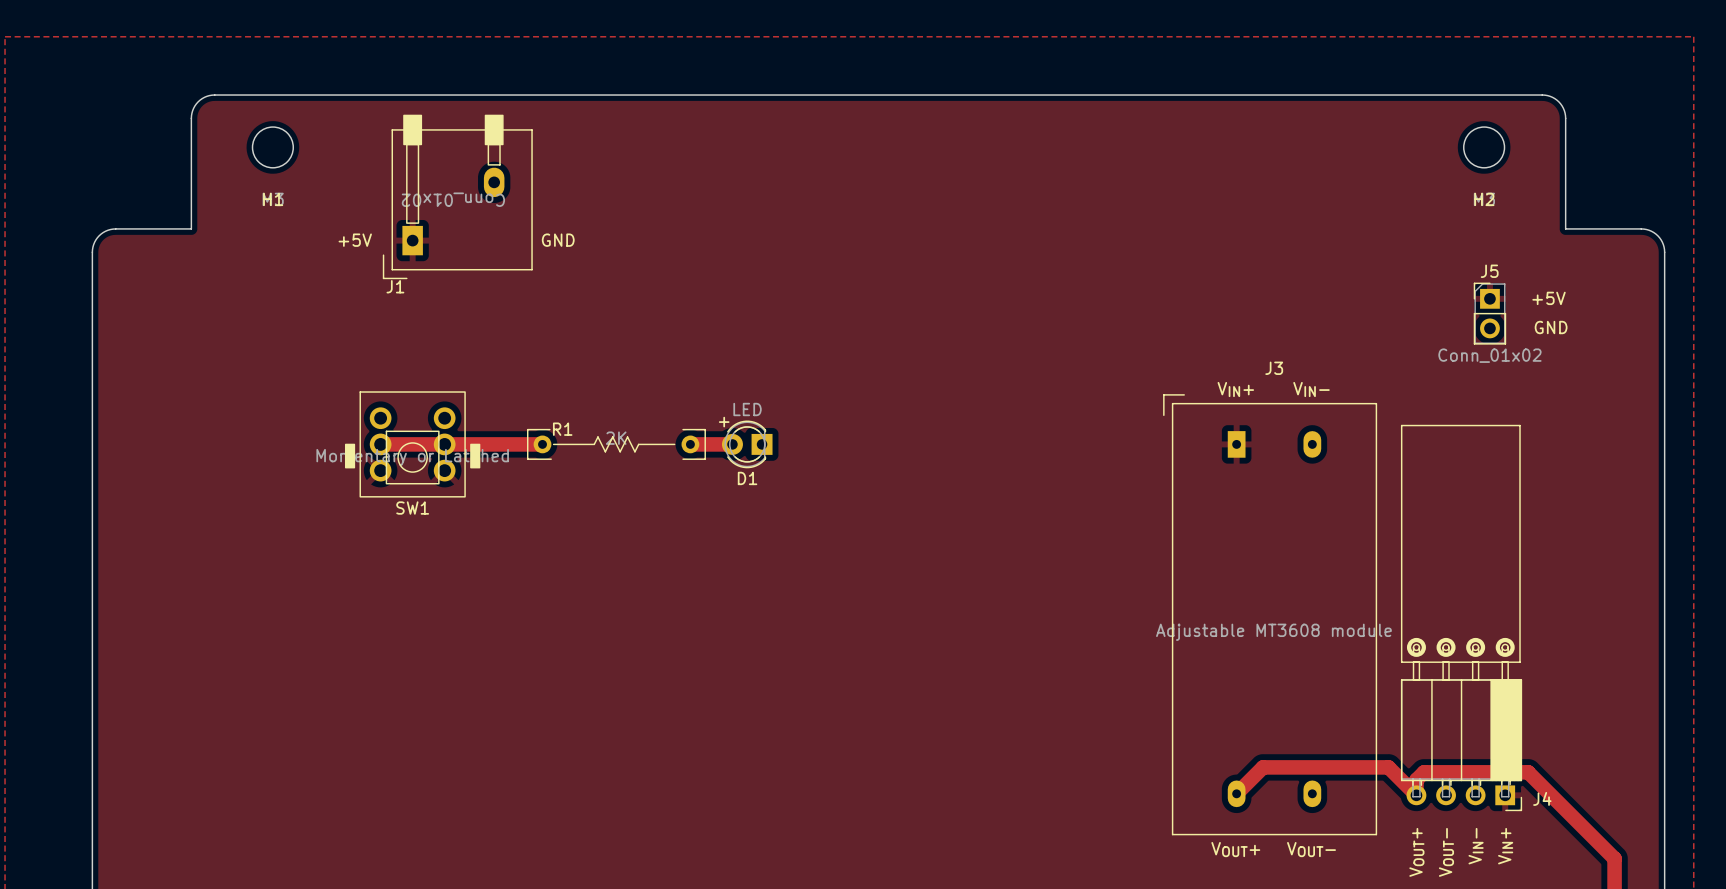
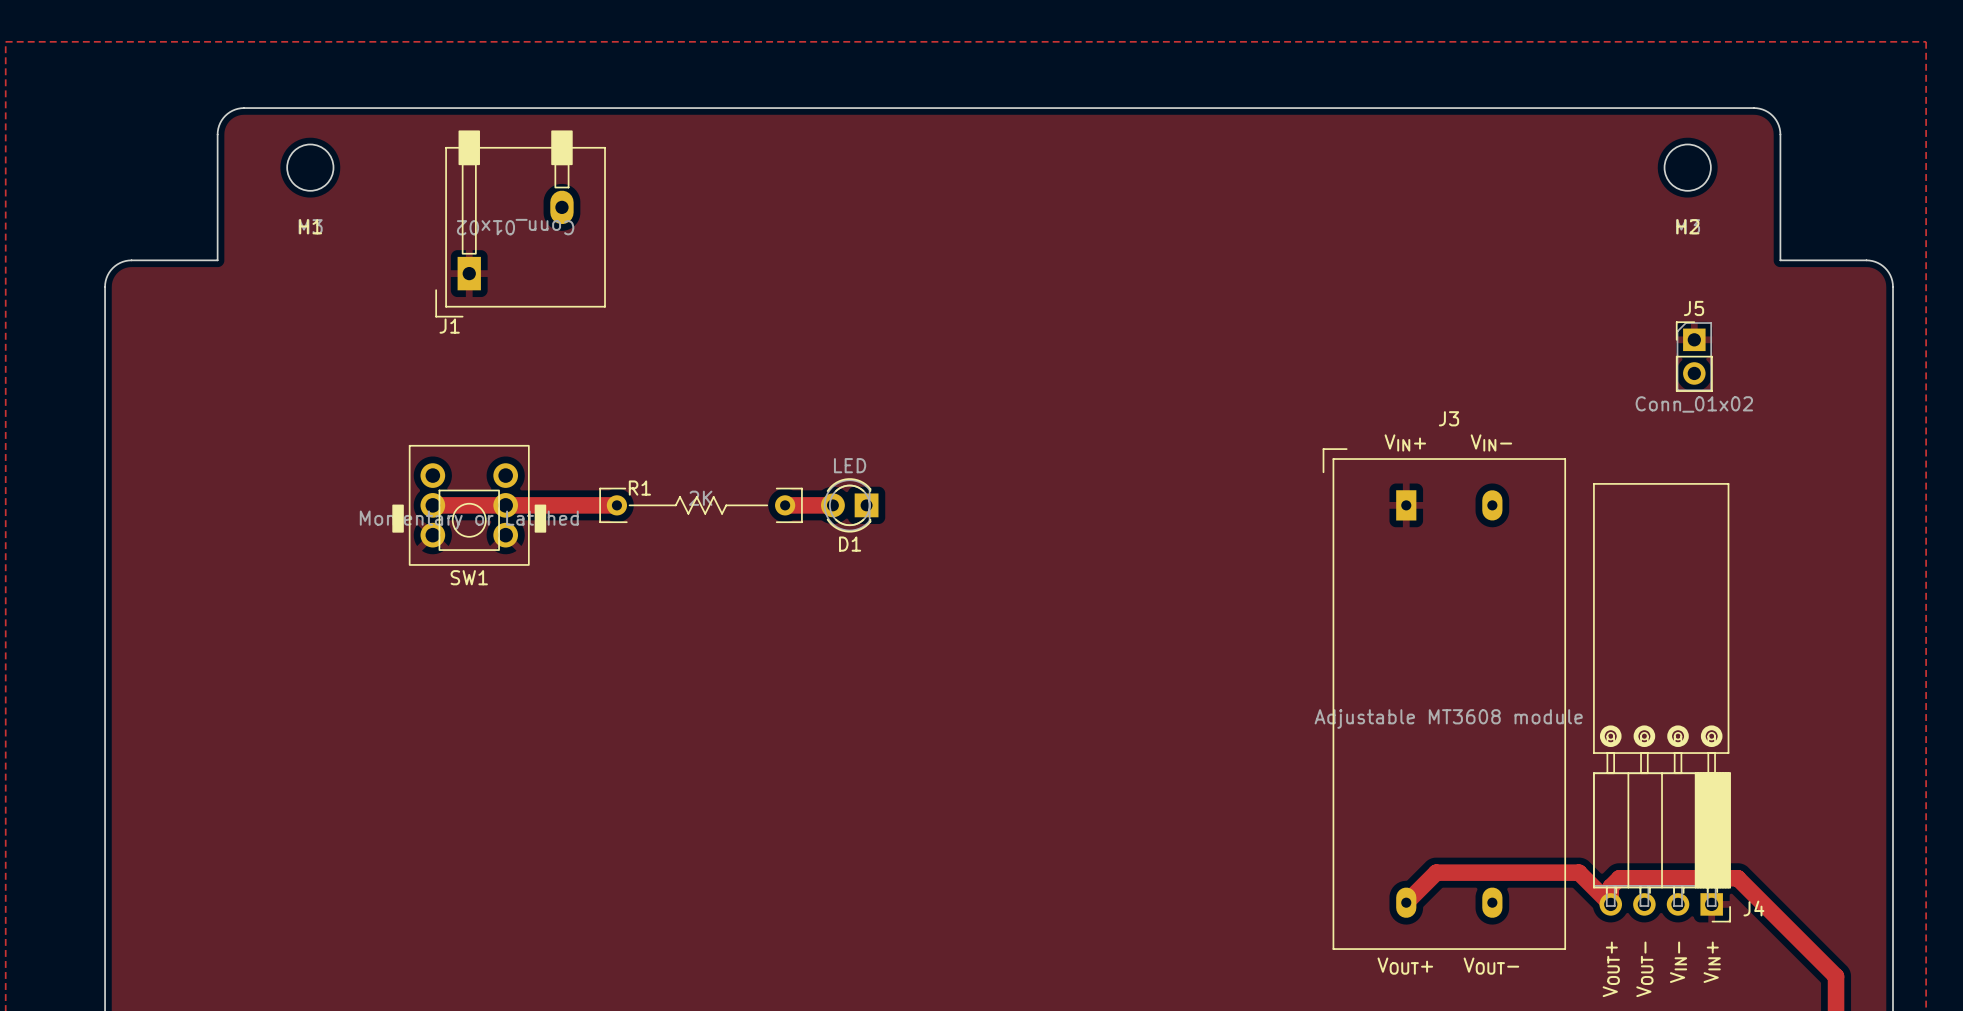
text: +5V (355, 240) -> none
text: GND (558, 240) -> none
text: +5V (1549, 298) -> none
text: GND (1551, 327) -> none
text: + (724, 422) -> none

